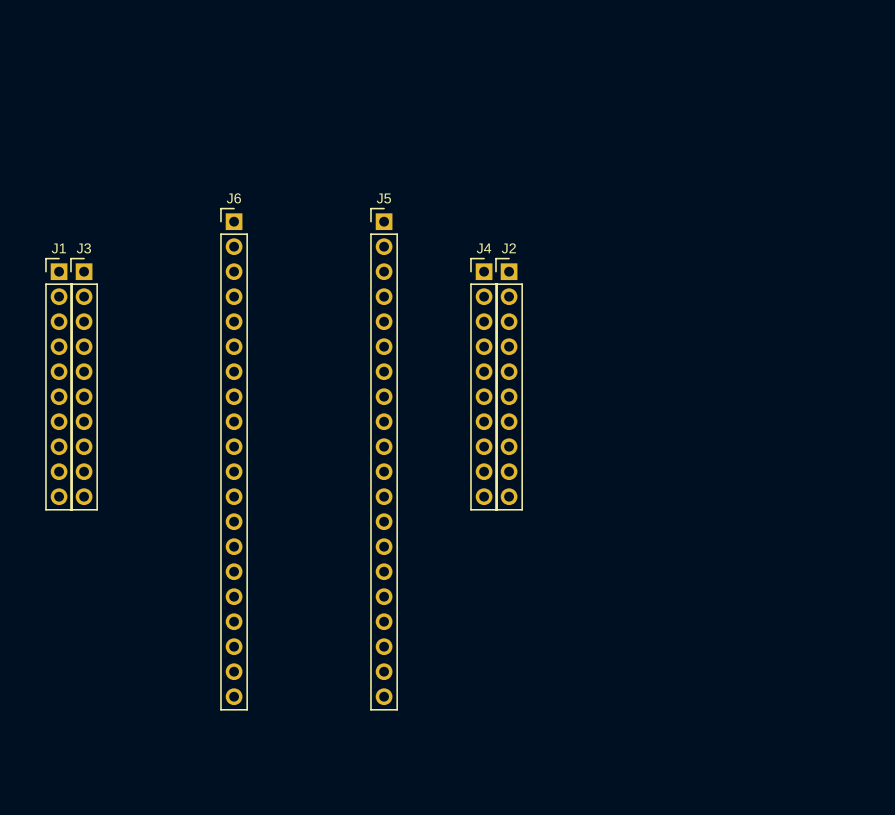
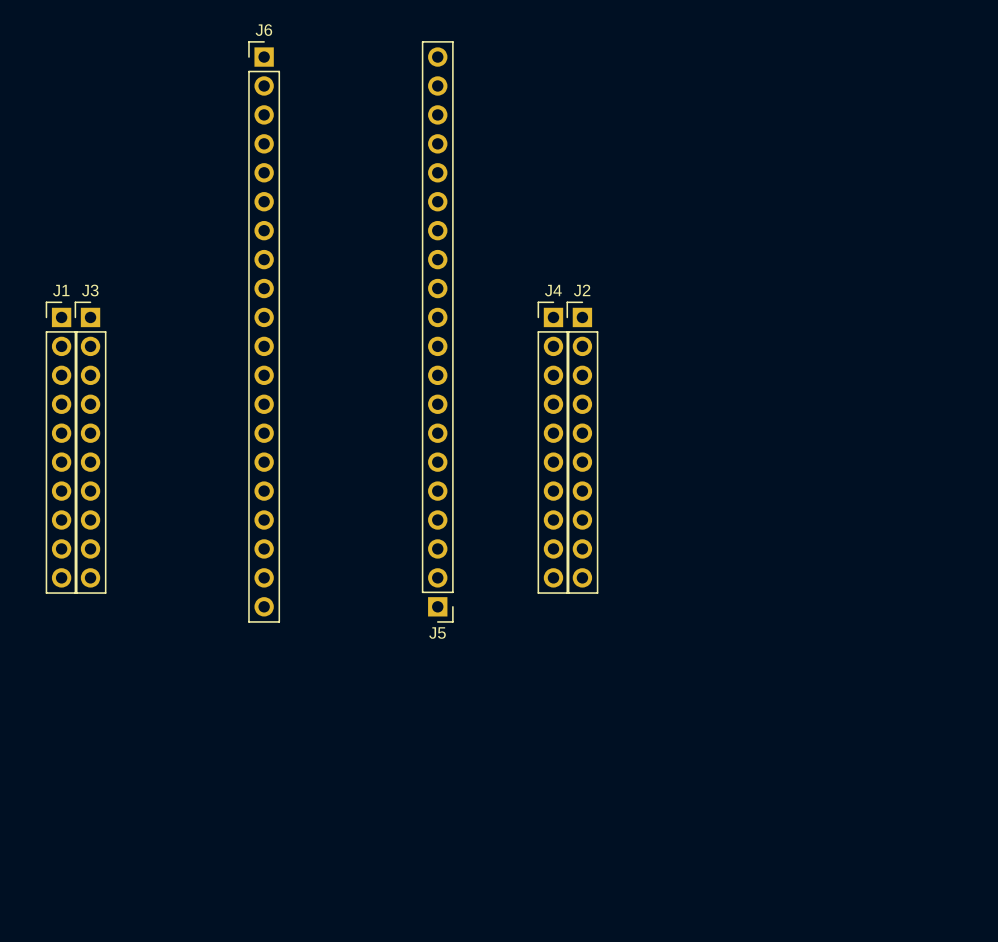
J6 position: (234, 459) -> (264, 331)
J5 rotation: 0° (384, 459) -> 180° (437, 331)

